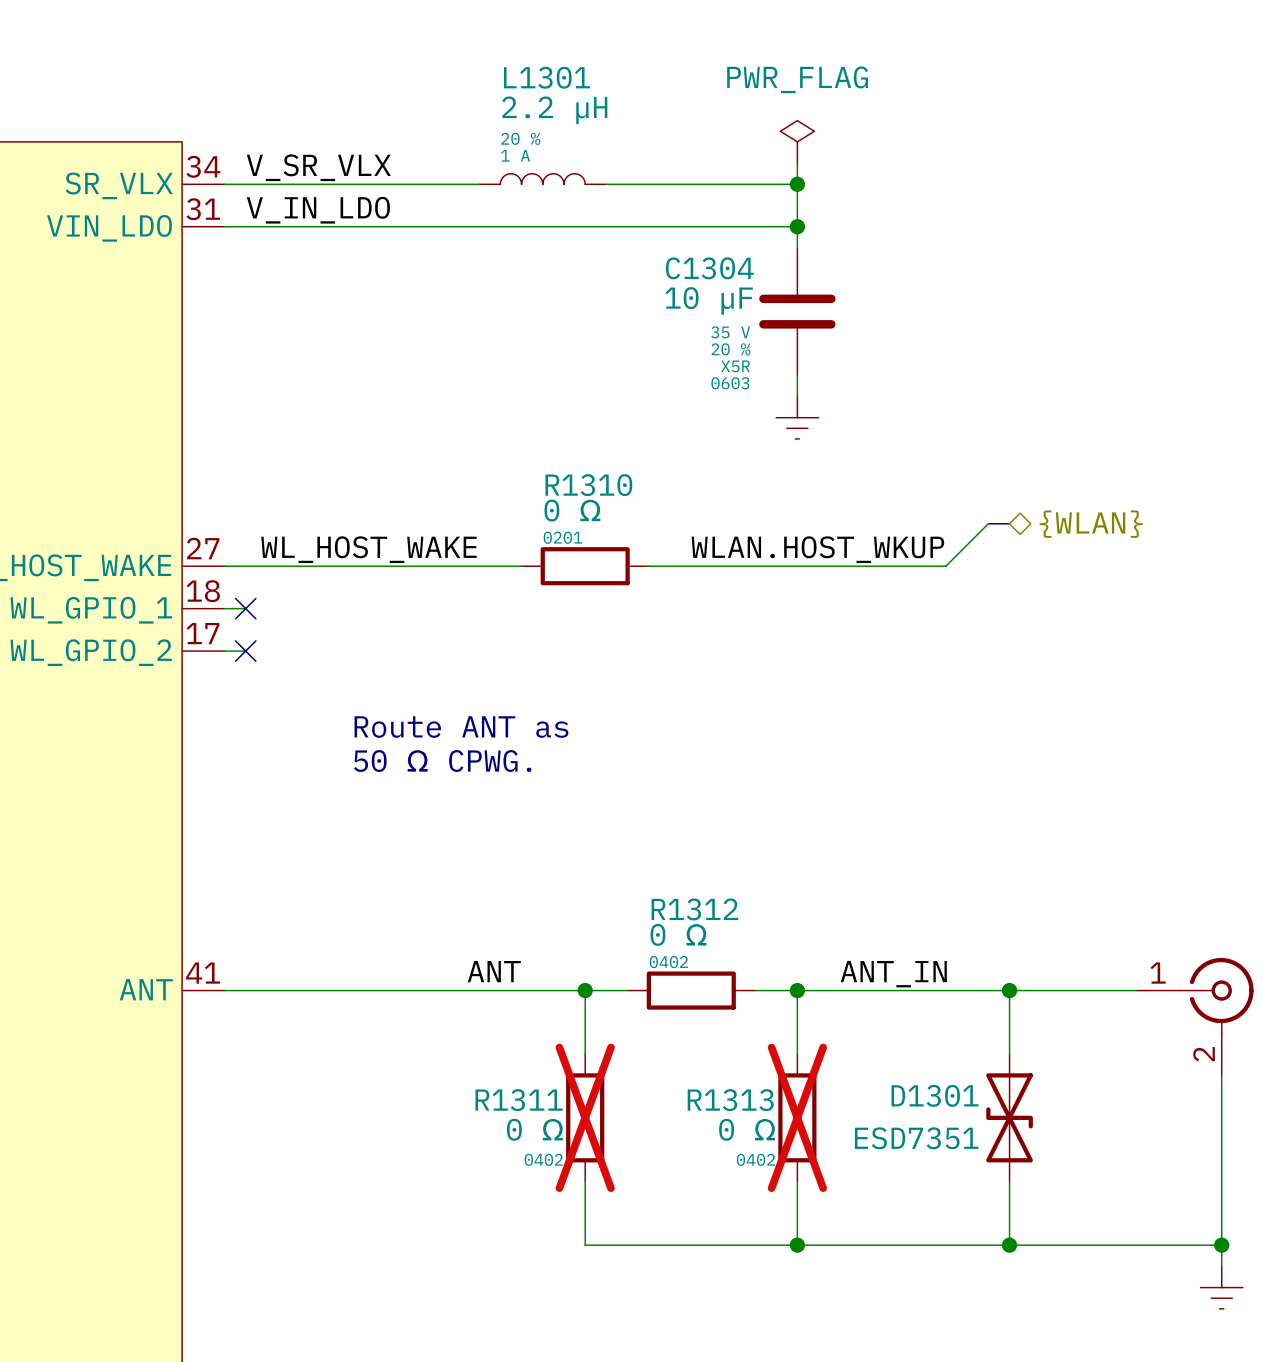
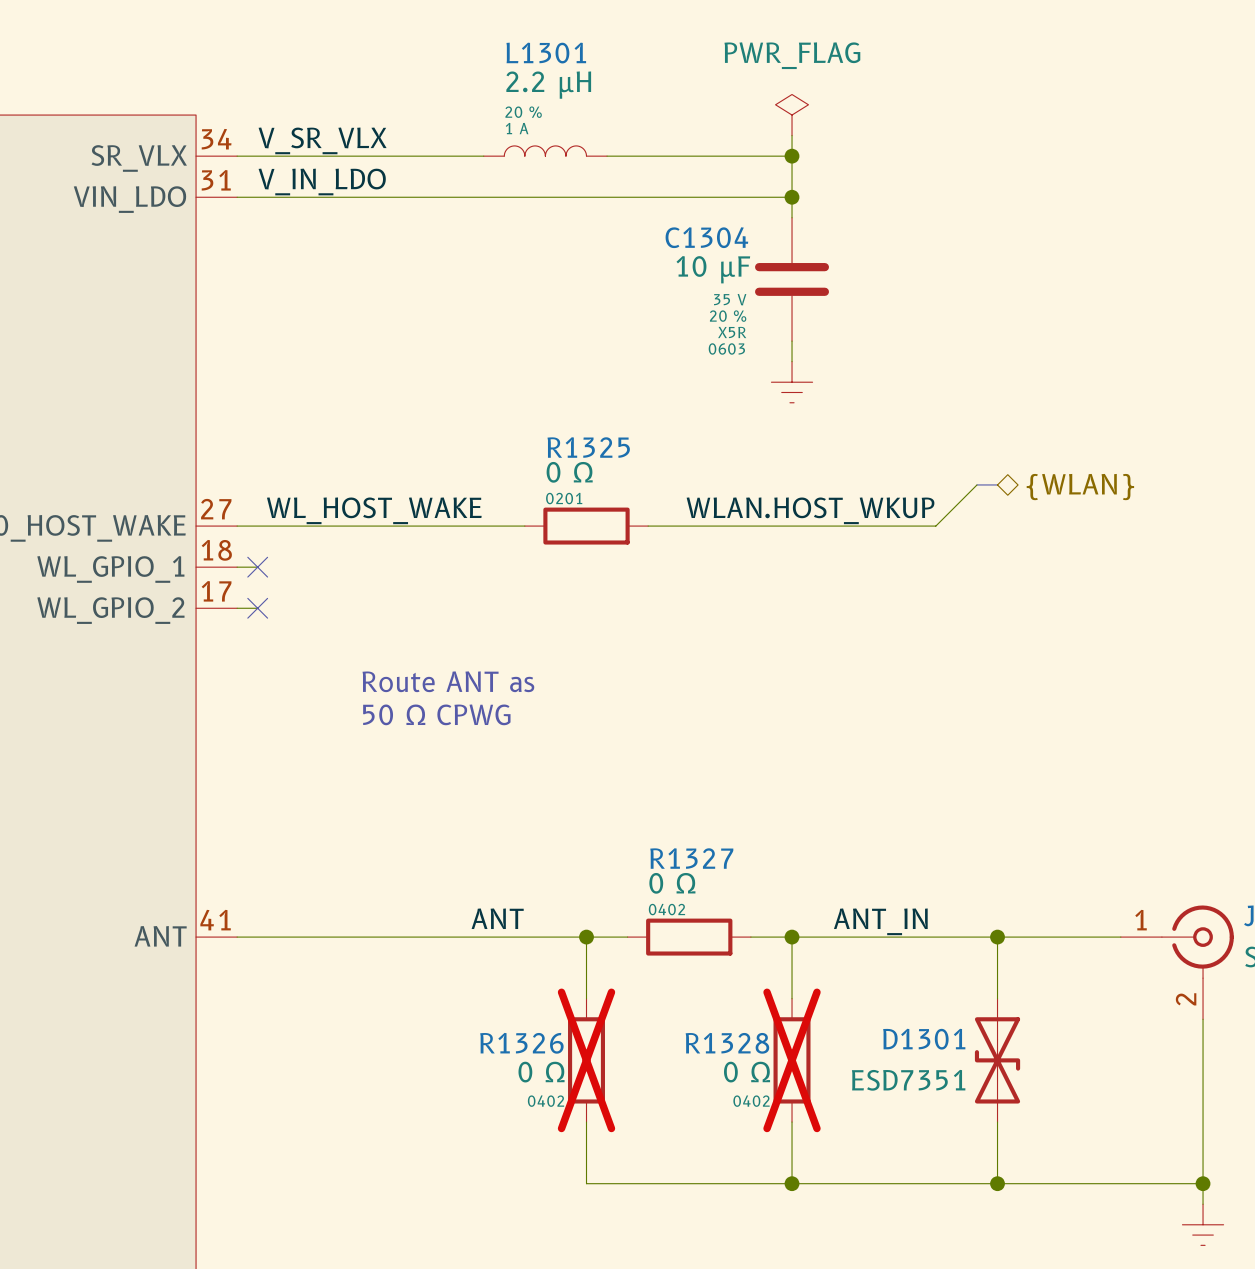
R1310 name: R1310 (588, 485) -> R1325 (588, 447)
text: 50 Ω CPWG. (442, 761) -> 50 Ω CPWG (436, 714)
R1312 name: R1312 (694, 909) -> R1327 (691, 858)
R1311 name: R1311 (519, 1100) -> R1326 (521, 1043)
R1313 name: R1313 (730, 1100) -> R1328 (727, 1043)

